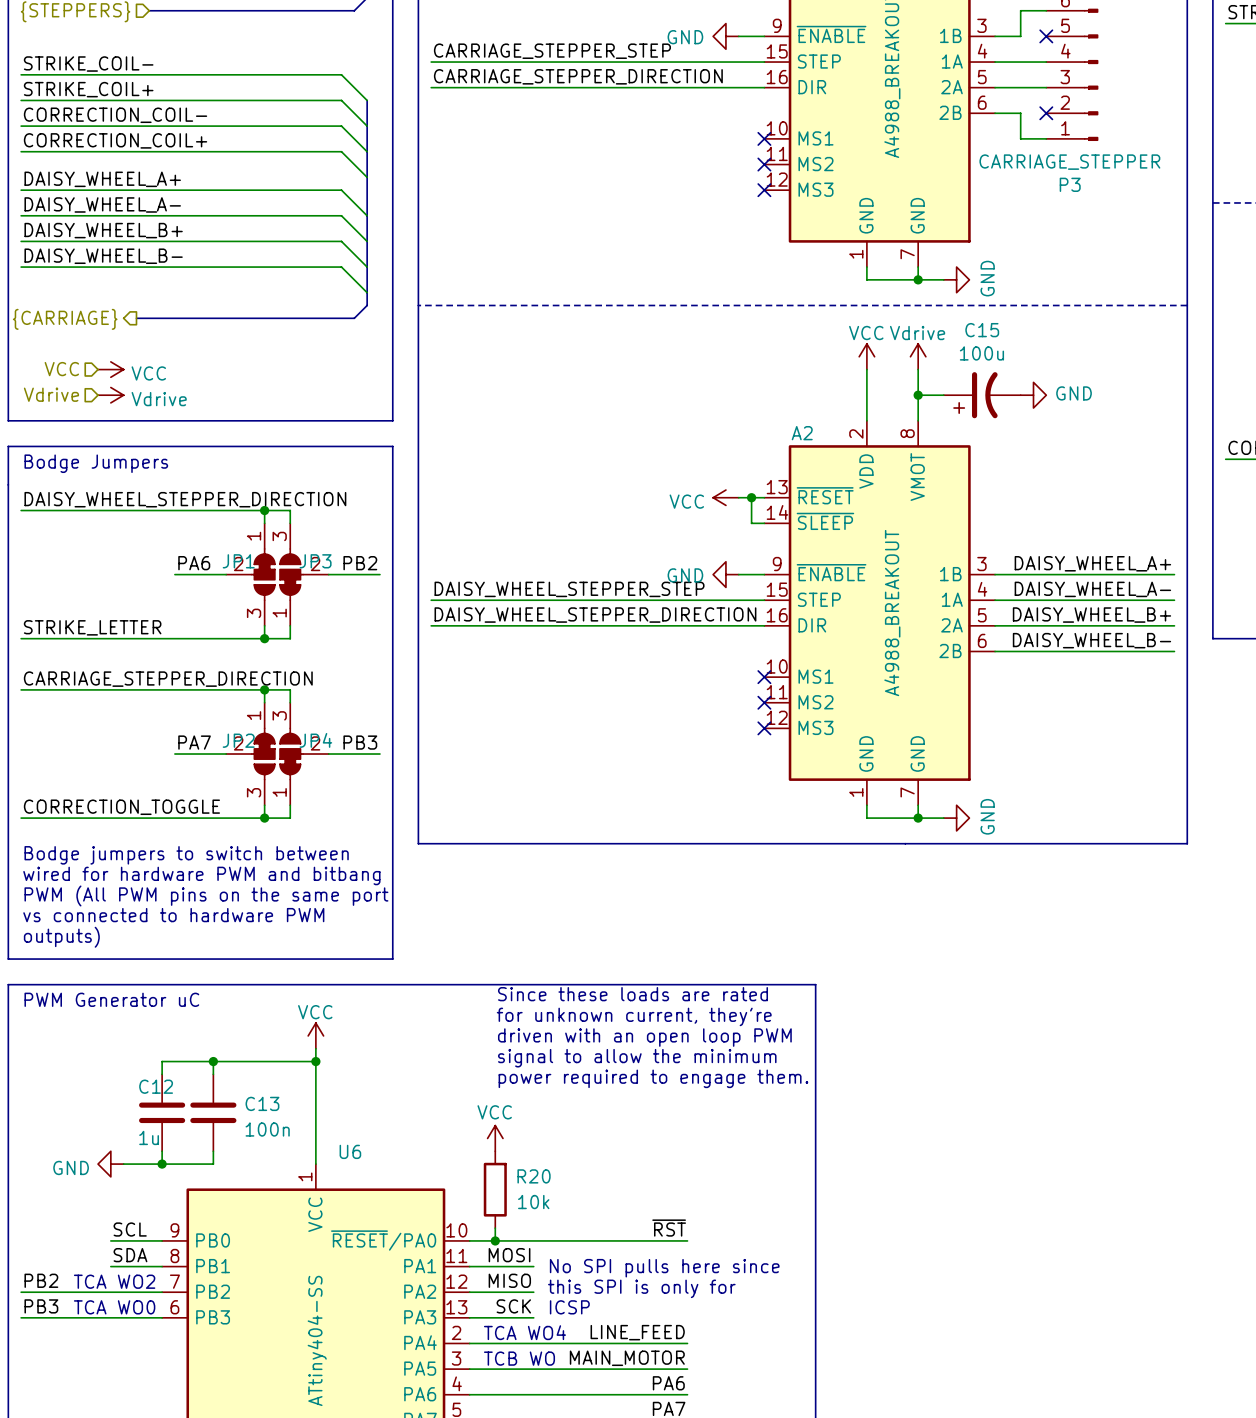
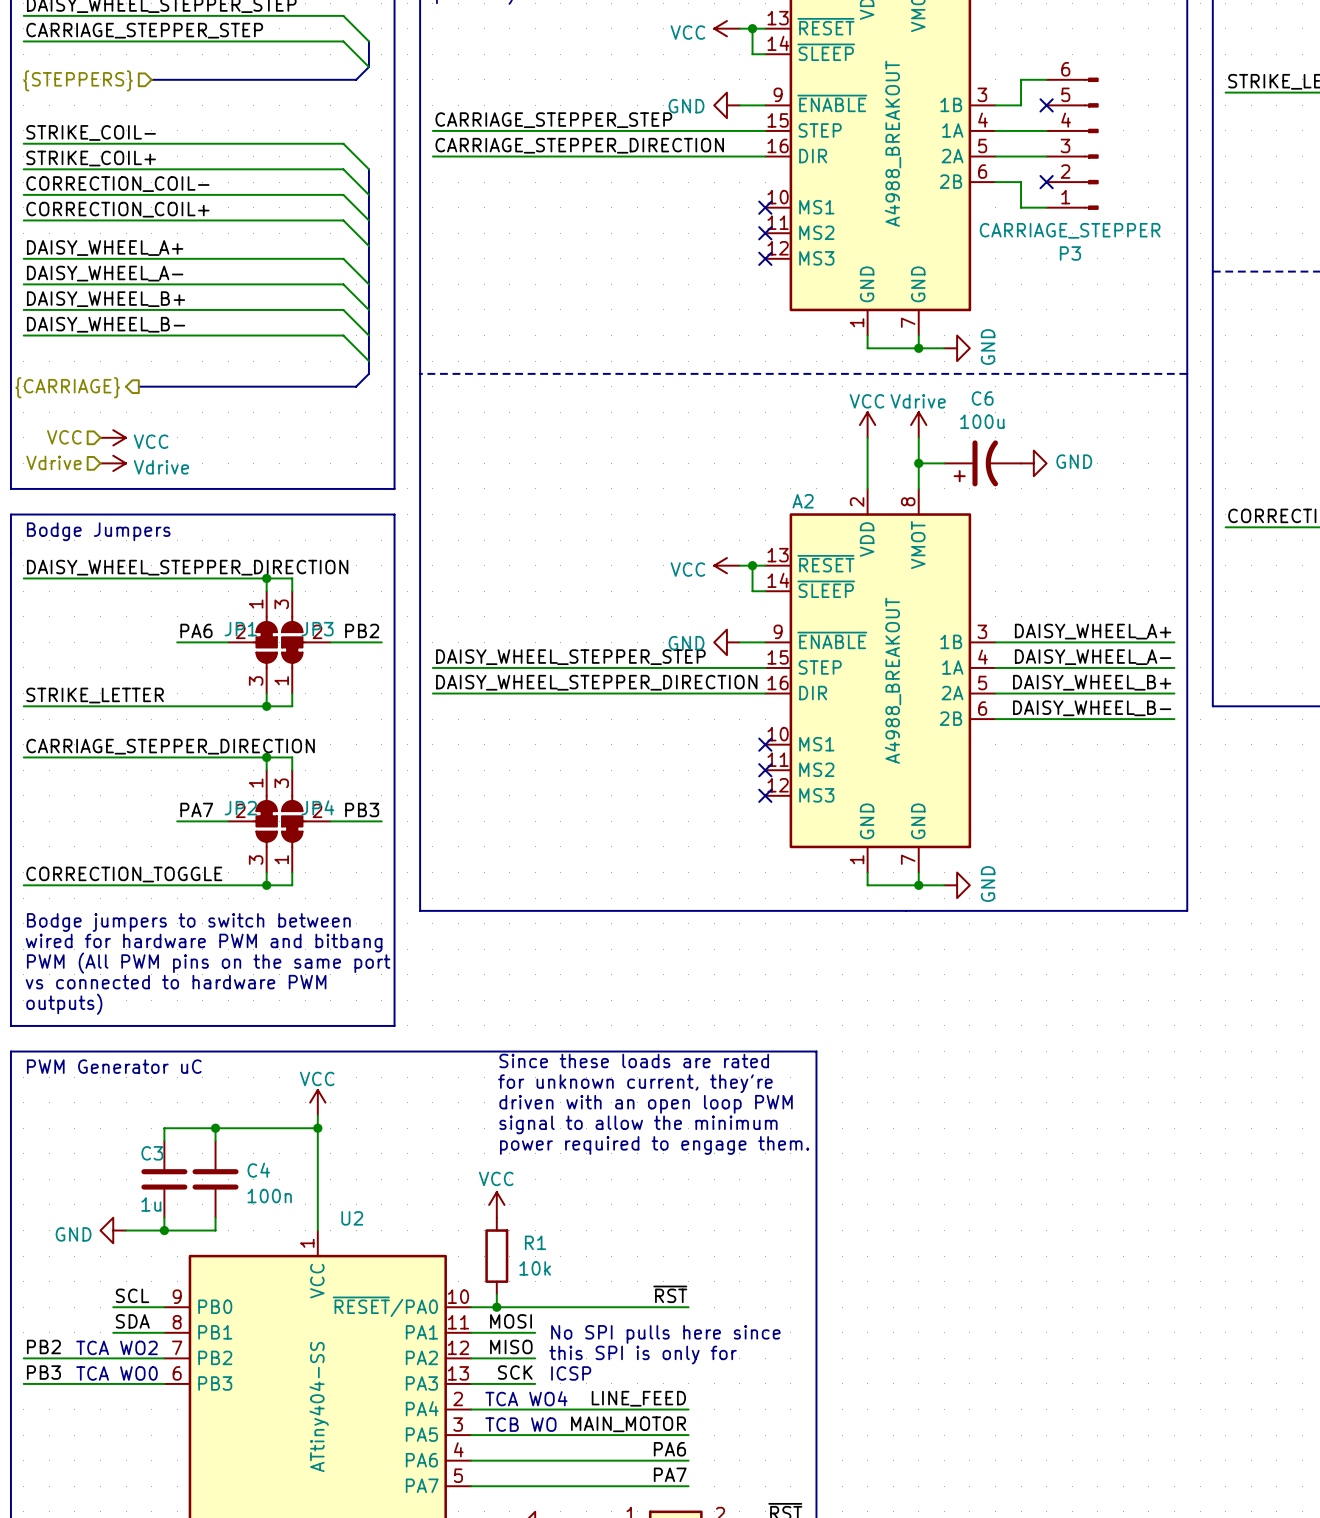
C15 name: C15 (982, 330) -> C6 (982, 398)
C12 name: C12 (156, 1086) -> C3 (152, 1153)
C13 name: C13 (262, 1103) -> C4 (258, 1170)
U6 name: U6 (350, 1151) -> U2 (352, 1218)
R20 name: R20 (534, 1176) -> R1 (535, 1242)

